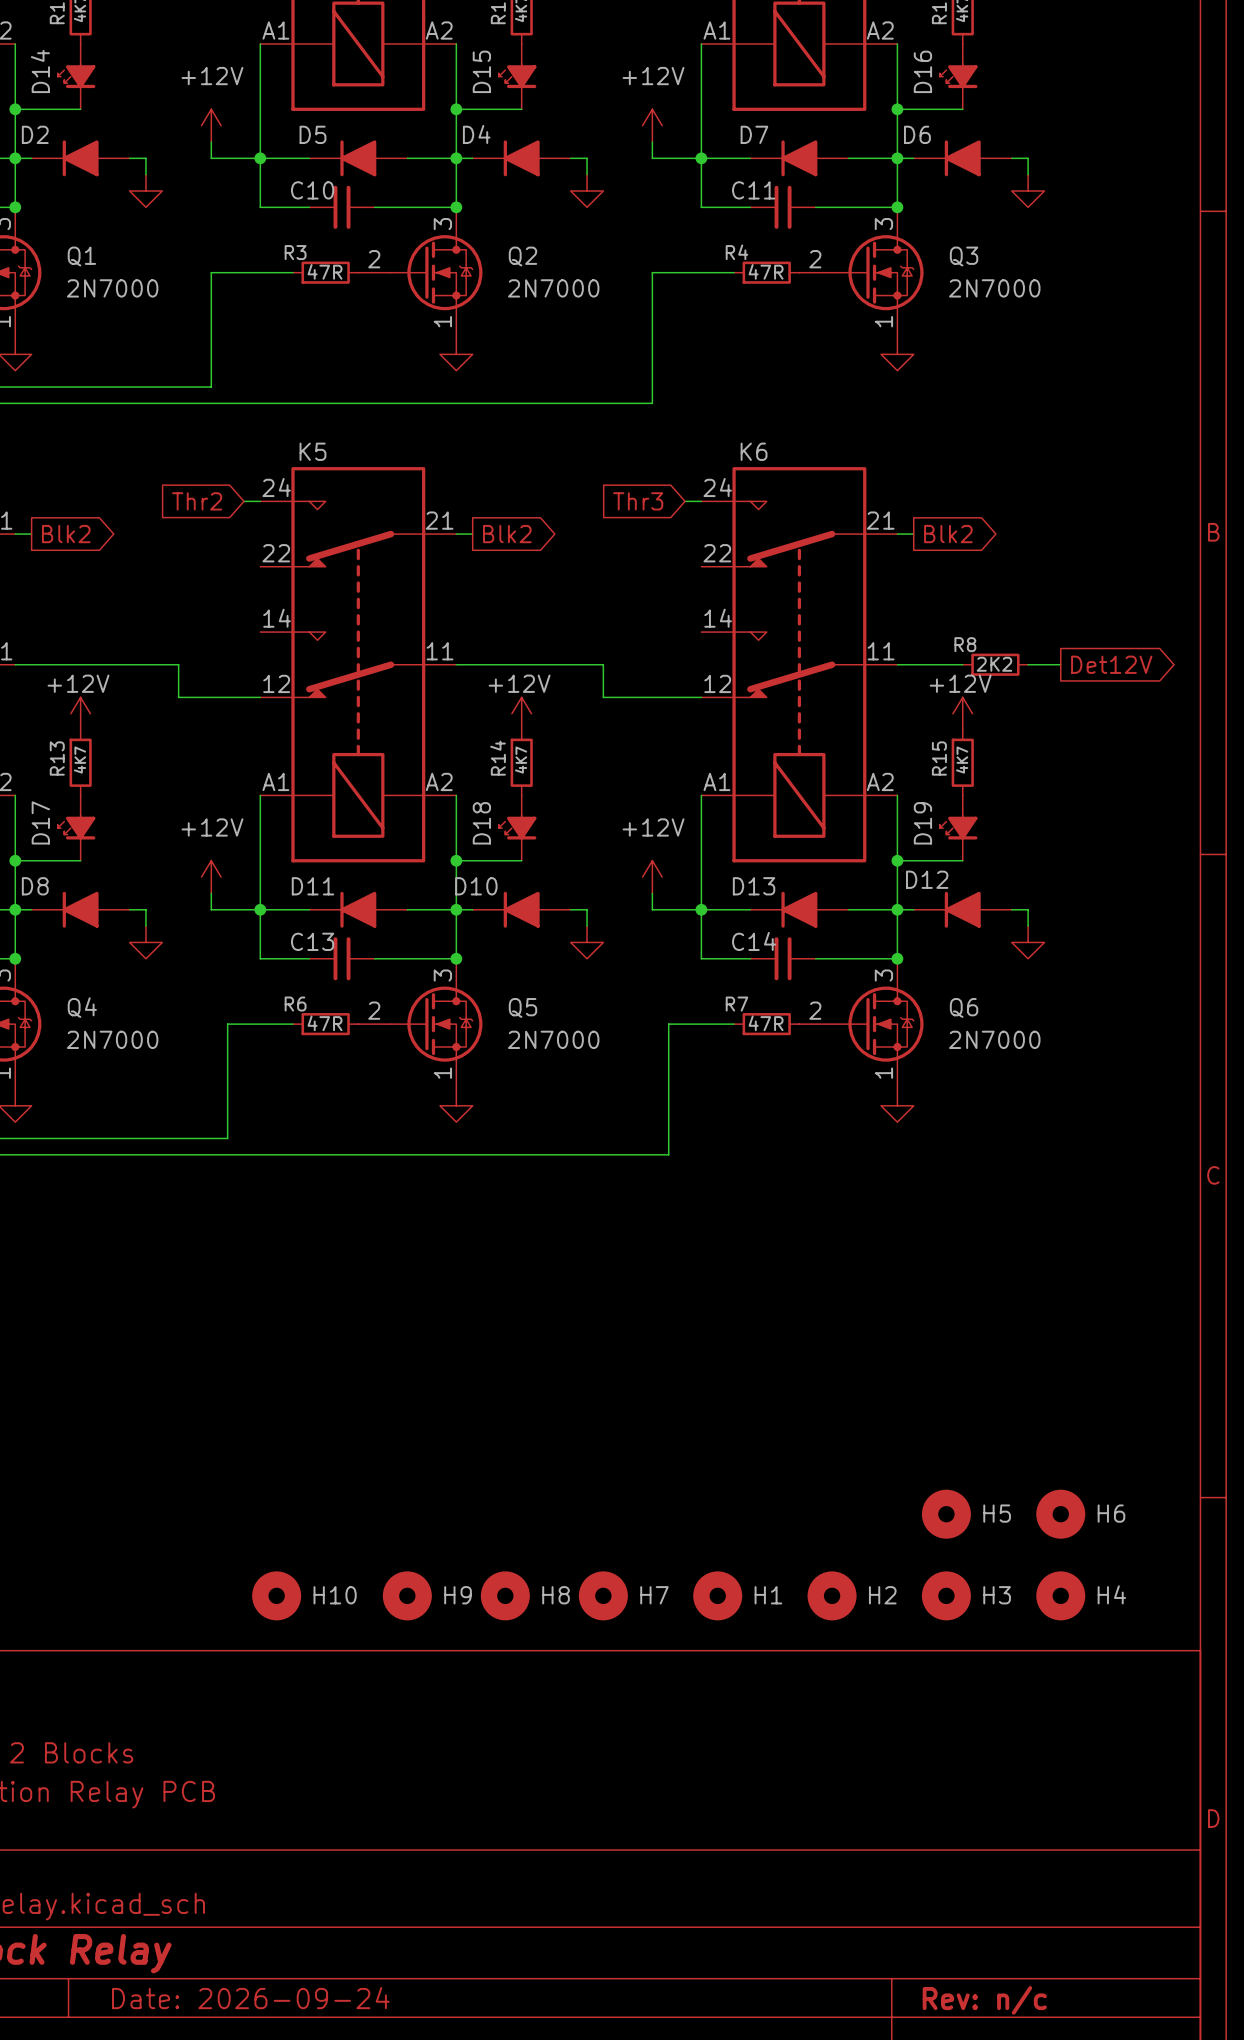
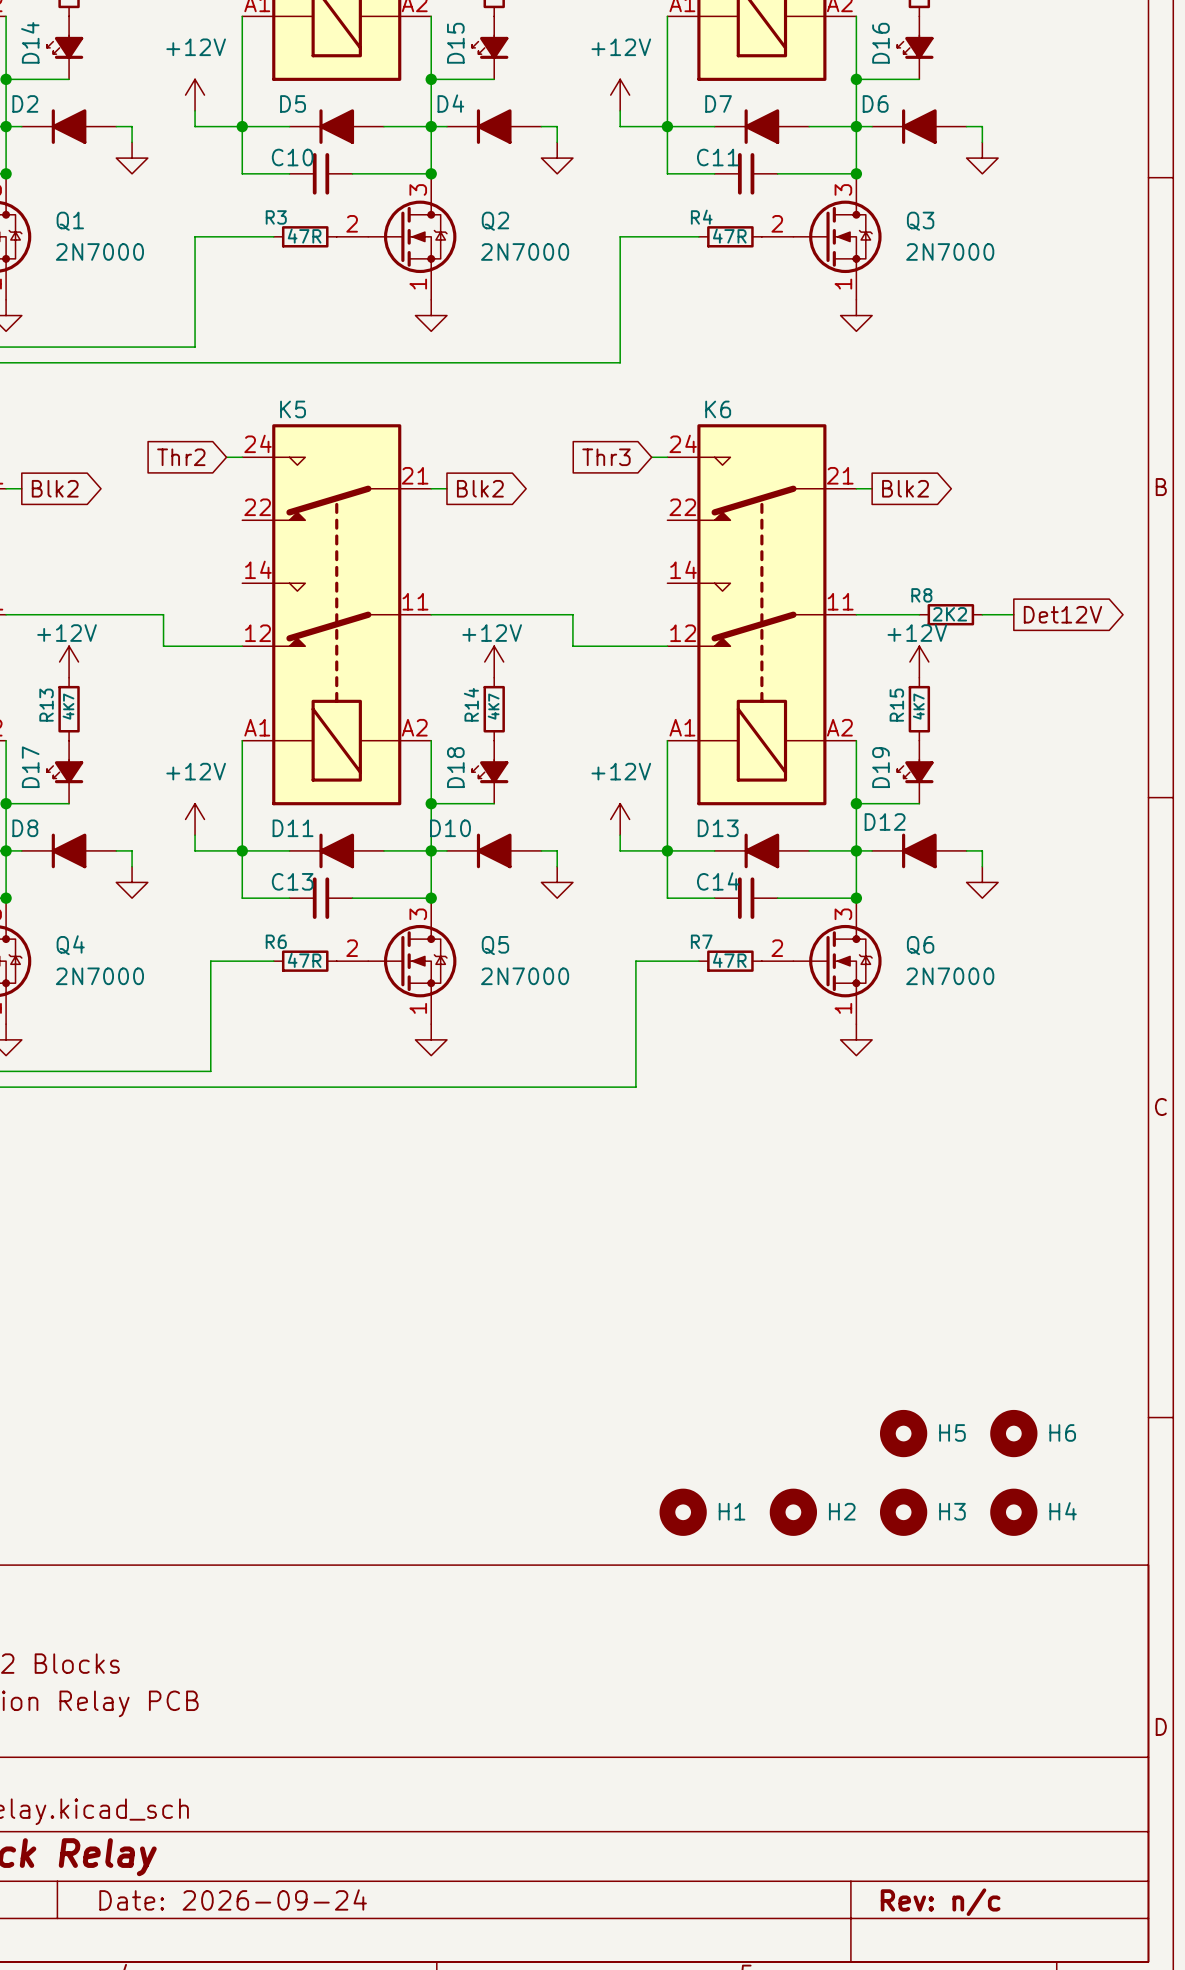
H10: (276, 1595) -> none
H9: (407, 1595) -> none
H8: (505, 1595) -> none
H7: (603, 1595) -> none

